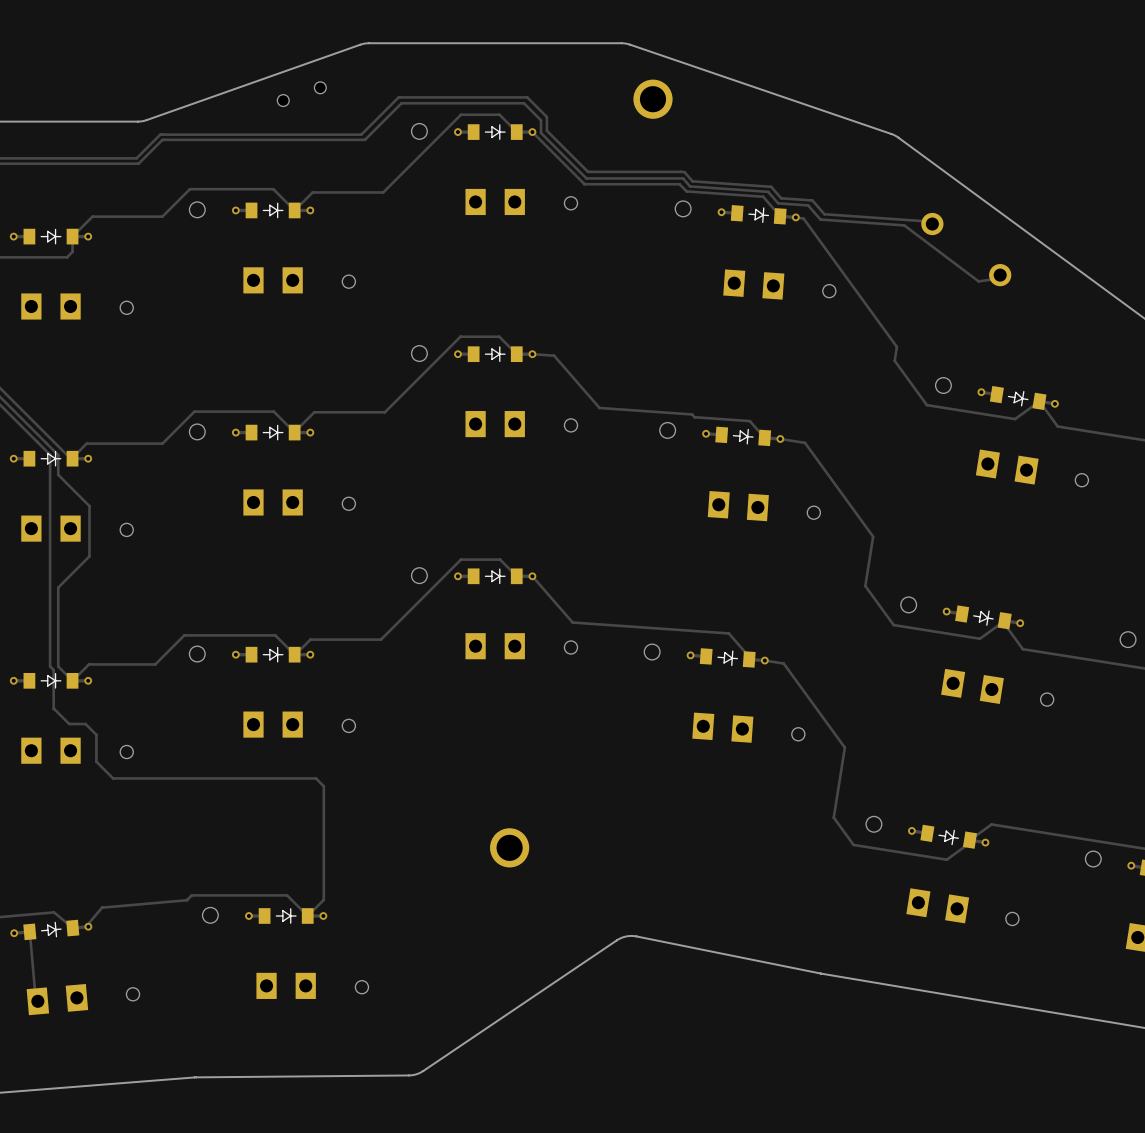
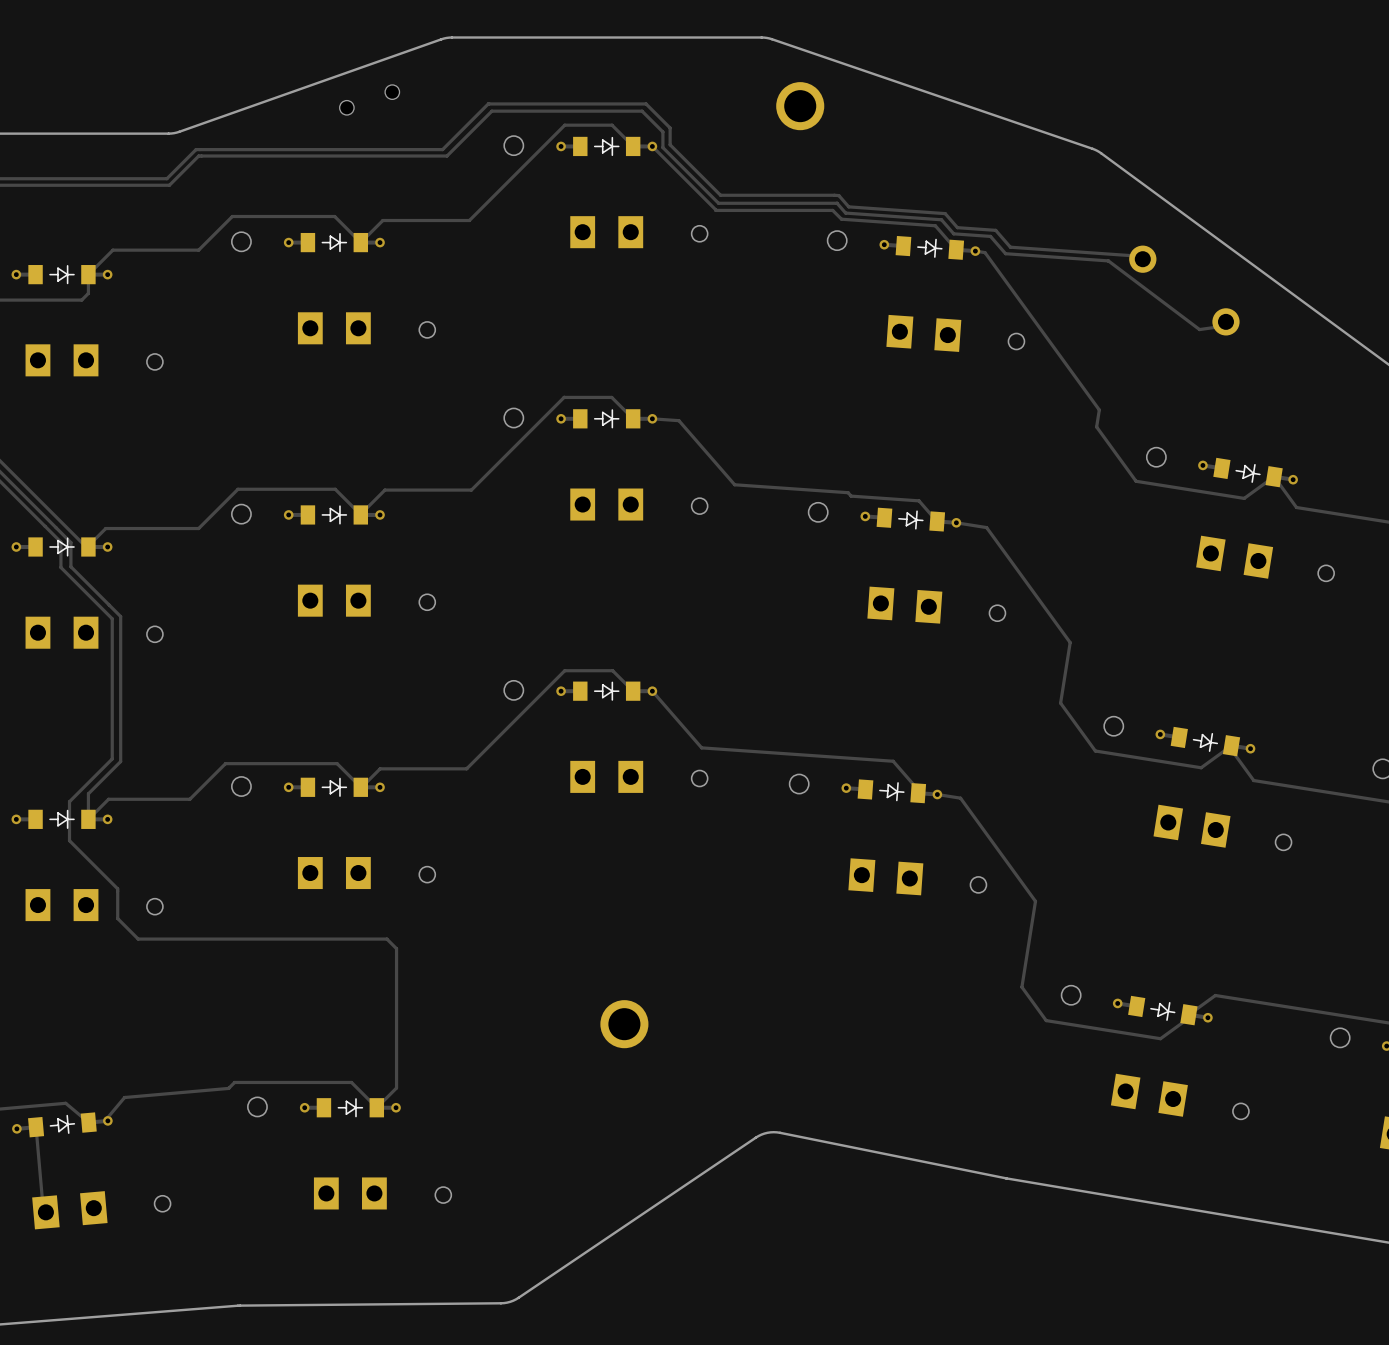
track: (50, 475) (50, 666) (53, 670) (53, 708) (69, 724) (85, 724) (96, 734) (96, 737) -> (60, 567) (112, 618) (112, 758) (69, 801) (69, 840) (117, 888)
track: (89, 506) (89, 556) (58, 587) (58, 666) (72, 680) -> (109, 605) (120, 616) (120, 761) (88, 793) (88, 819)

